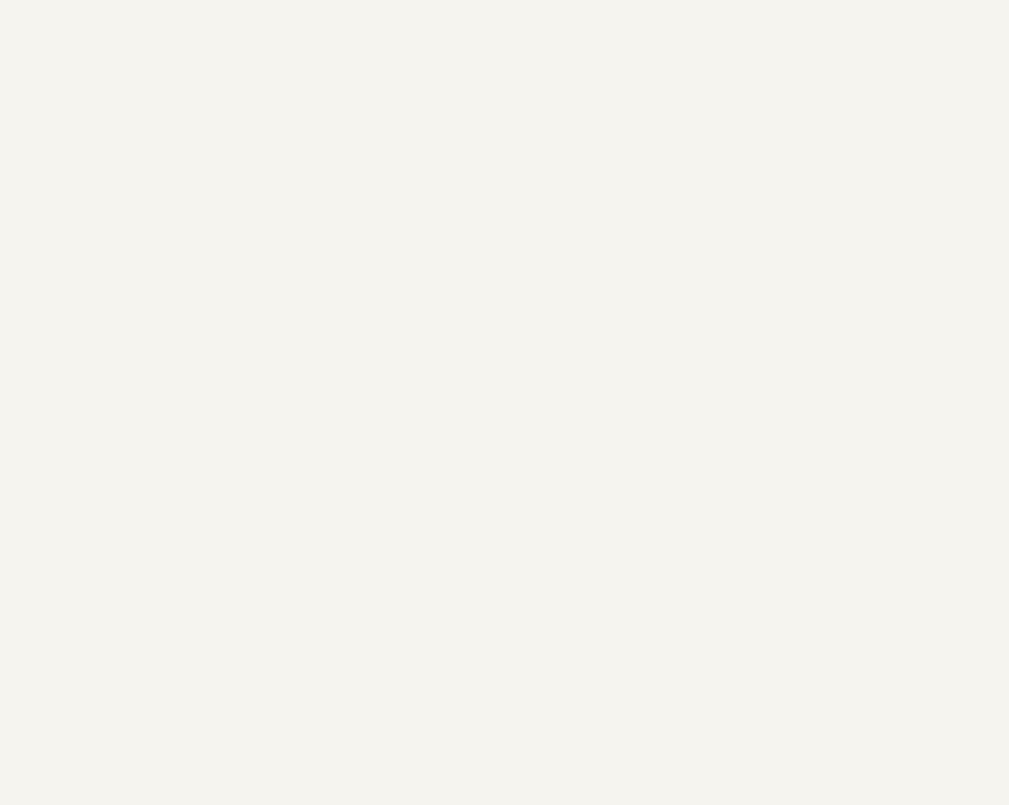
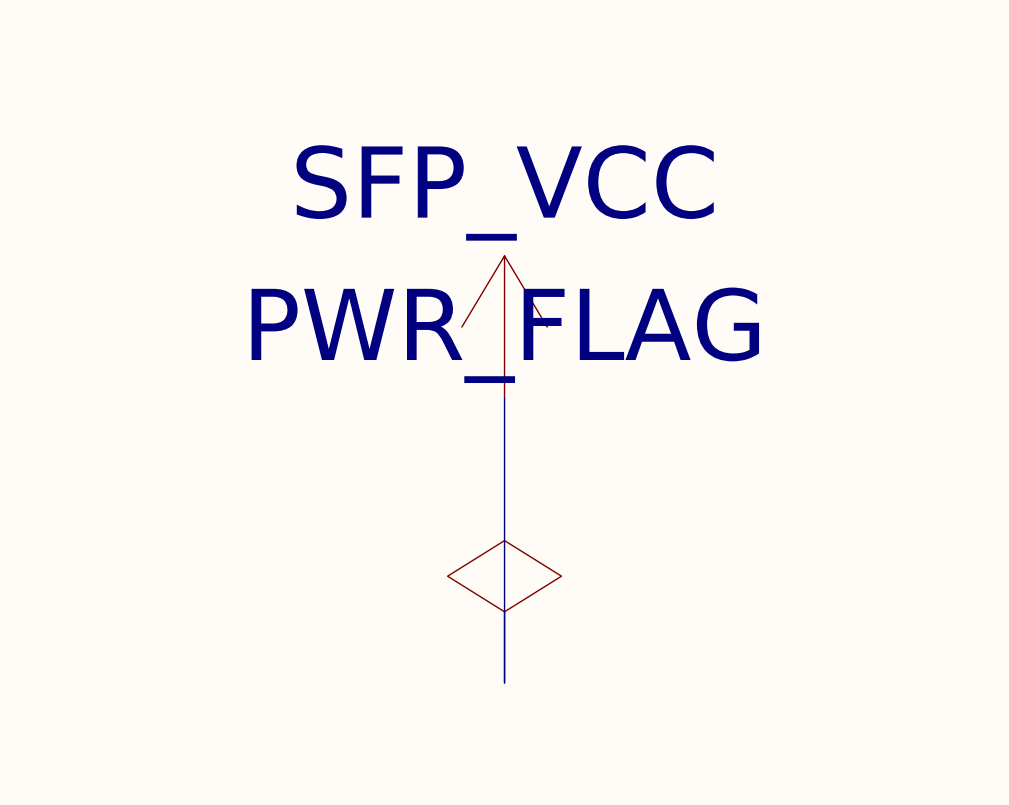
power symbol: none -> SFP_VCC (504, 327)
wire: none -> (504, 398) (504, 682)
power symbol: none -> PWR_FLAG (504, 611)

